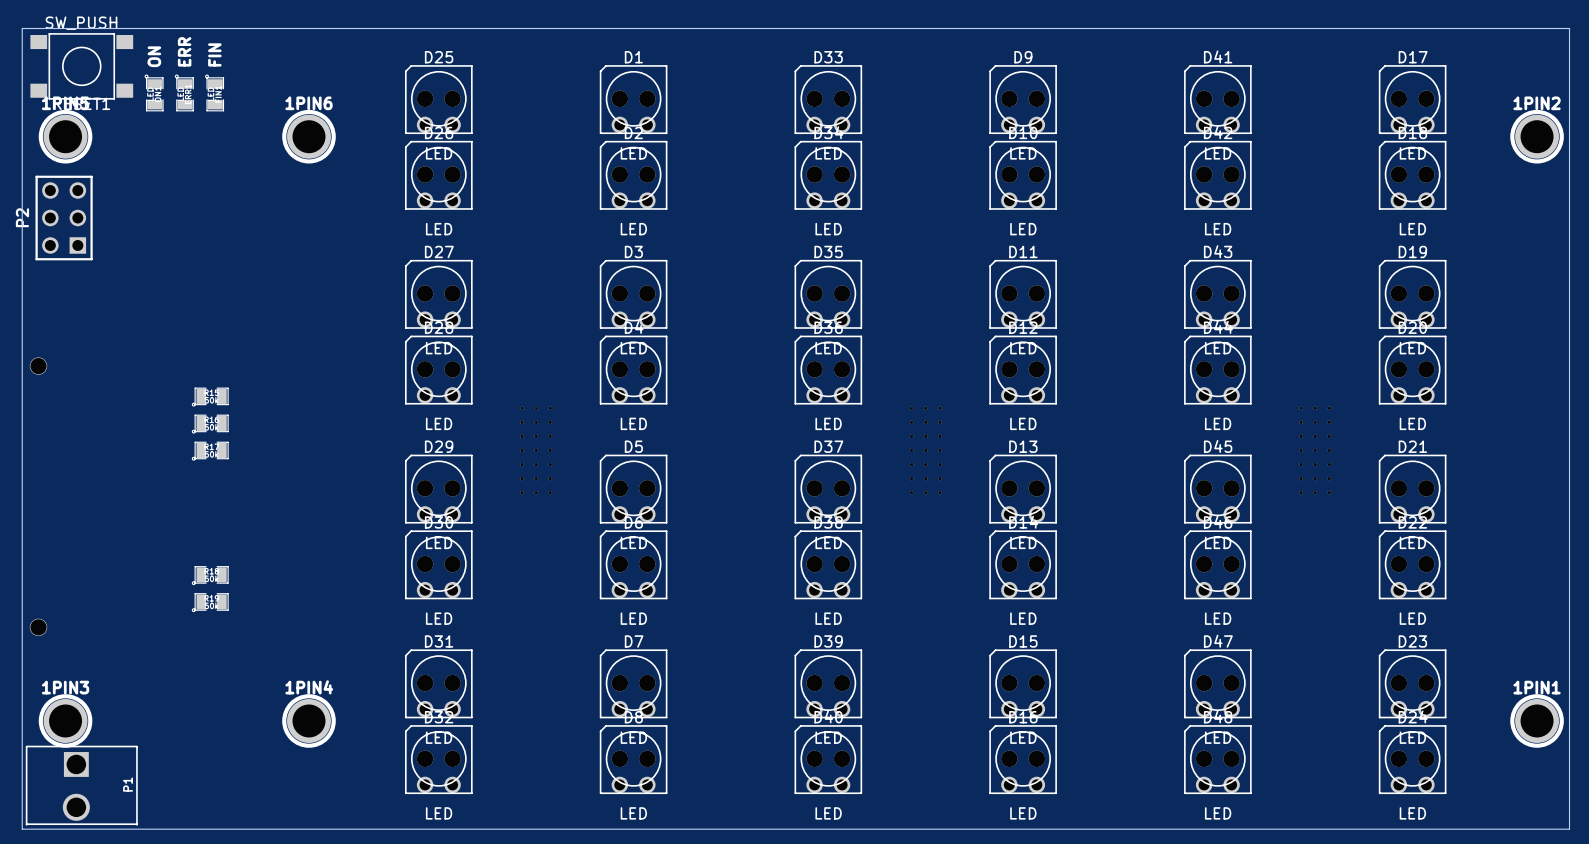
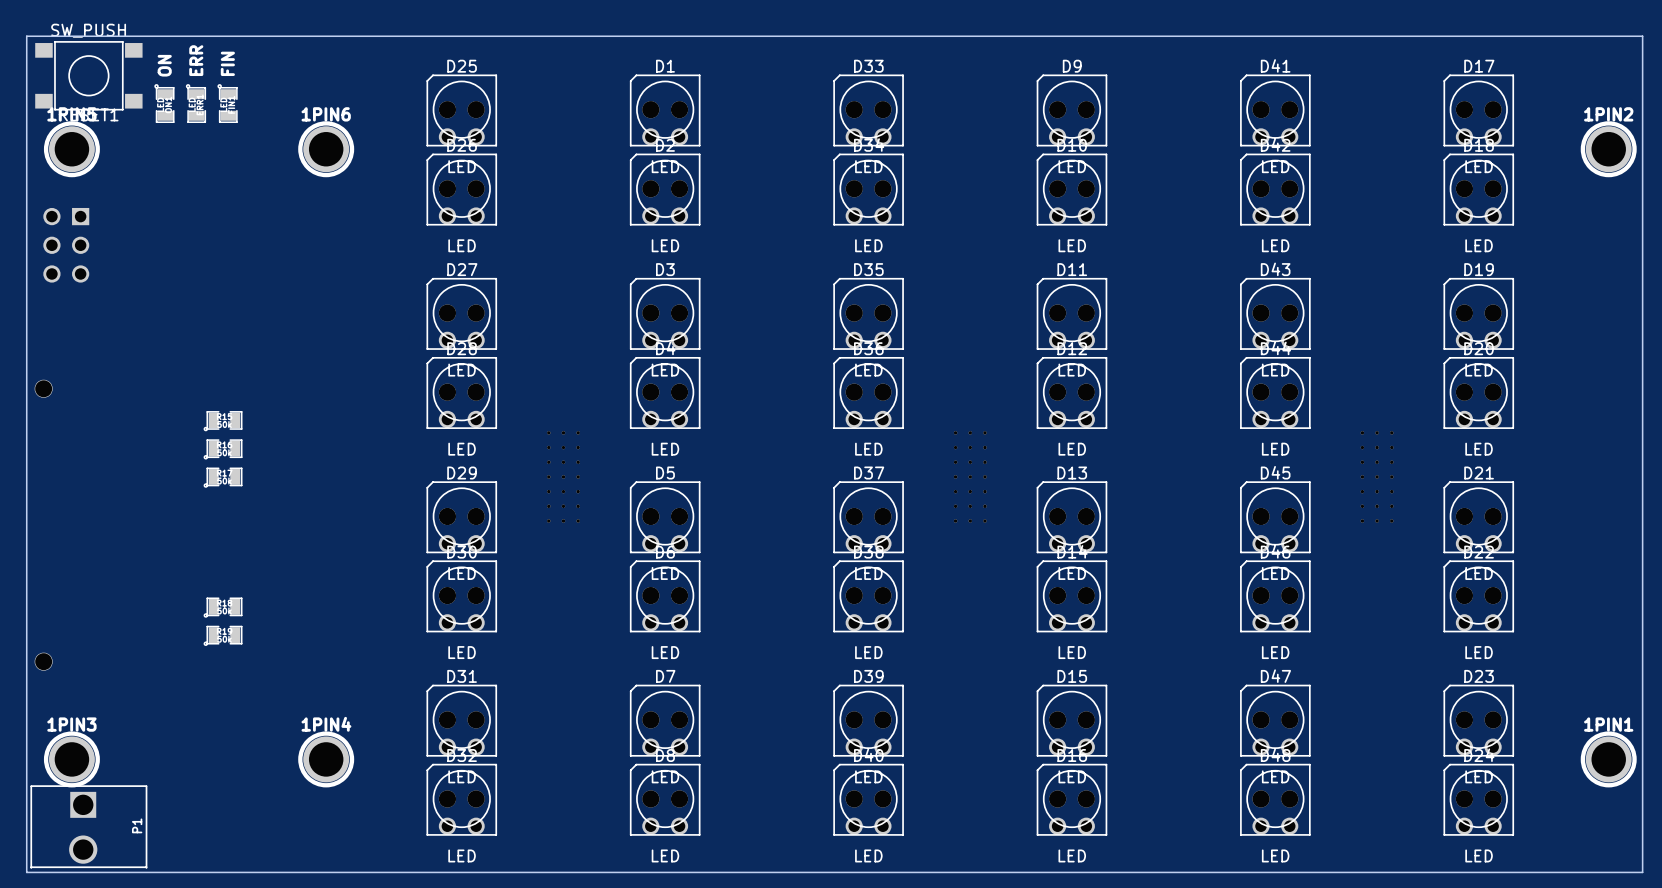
P2 side: top (64, 218) -> bottom (66, 245)

